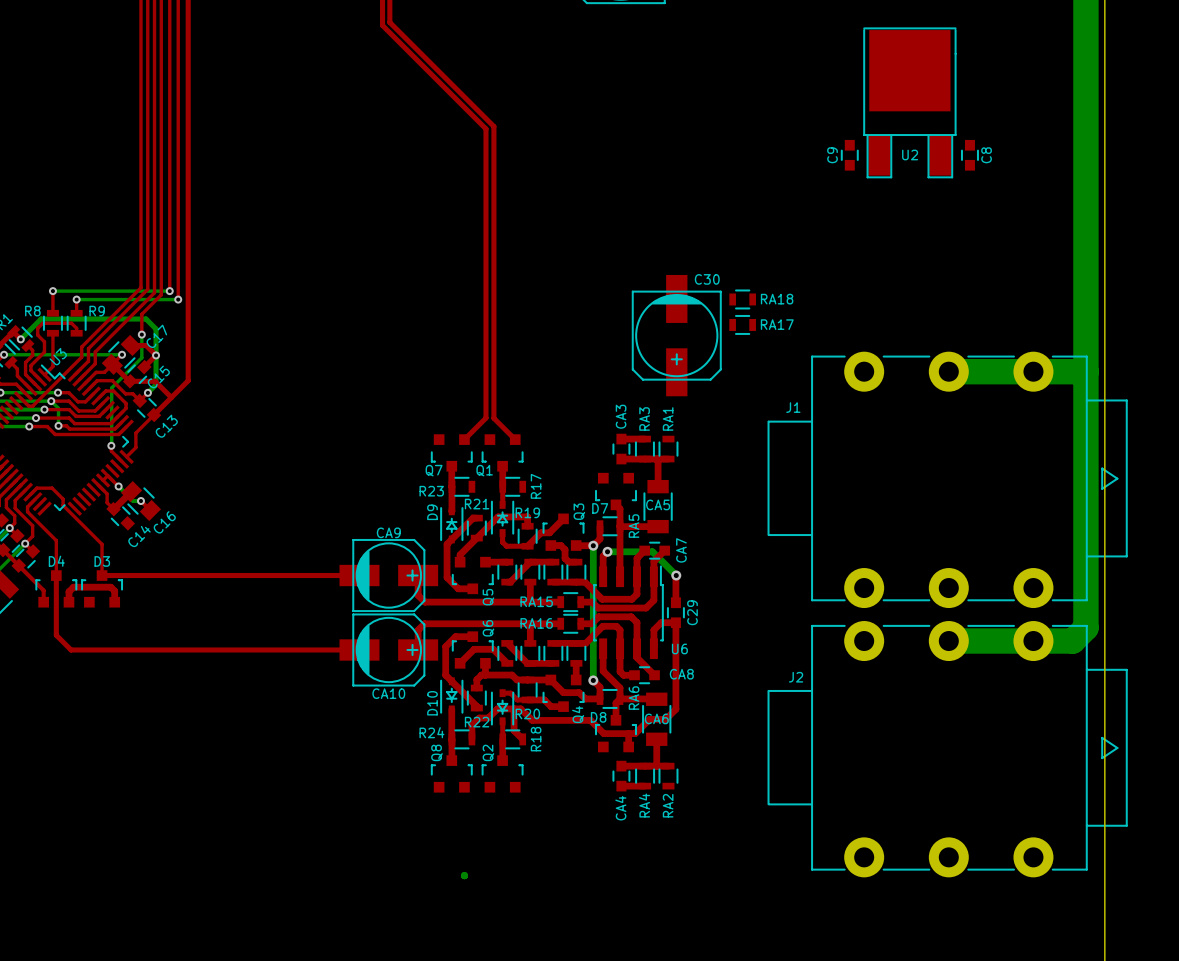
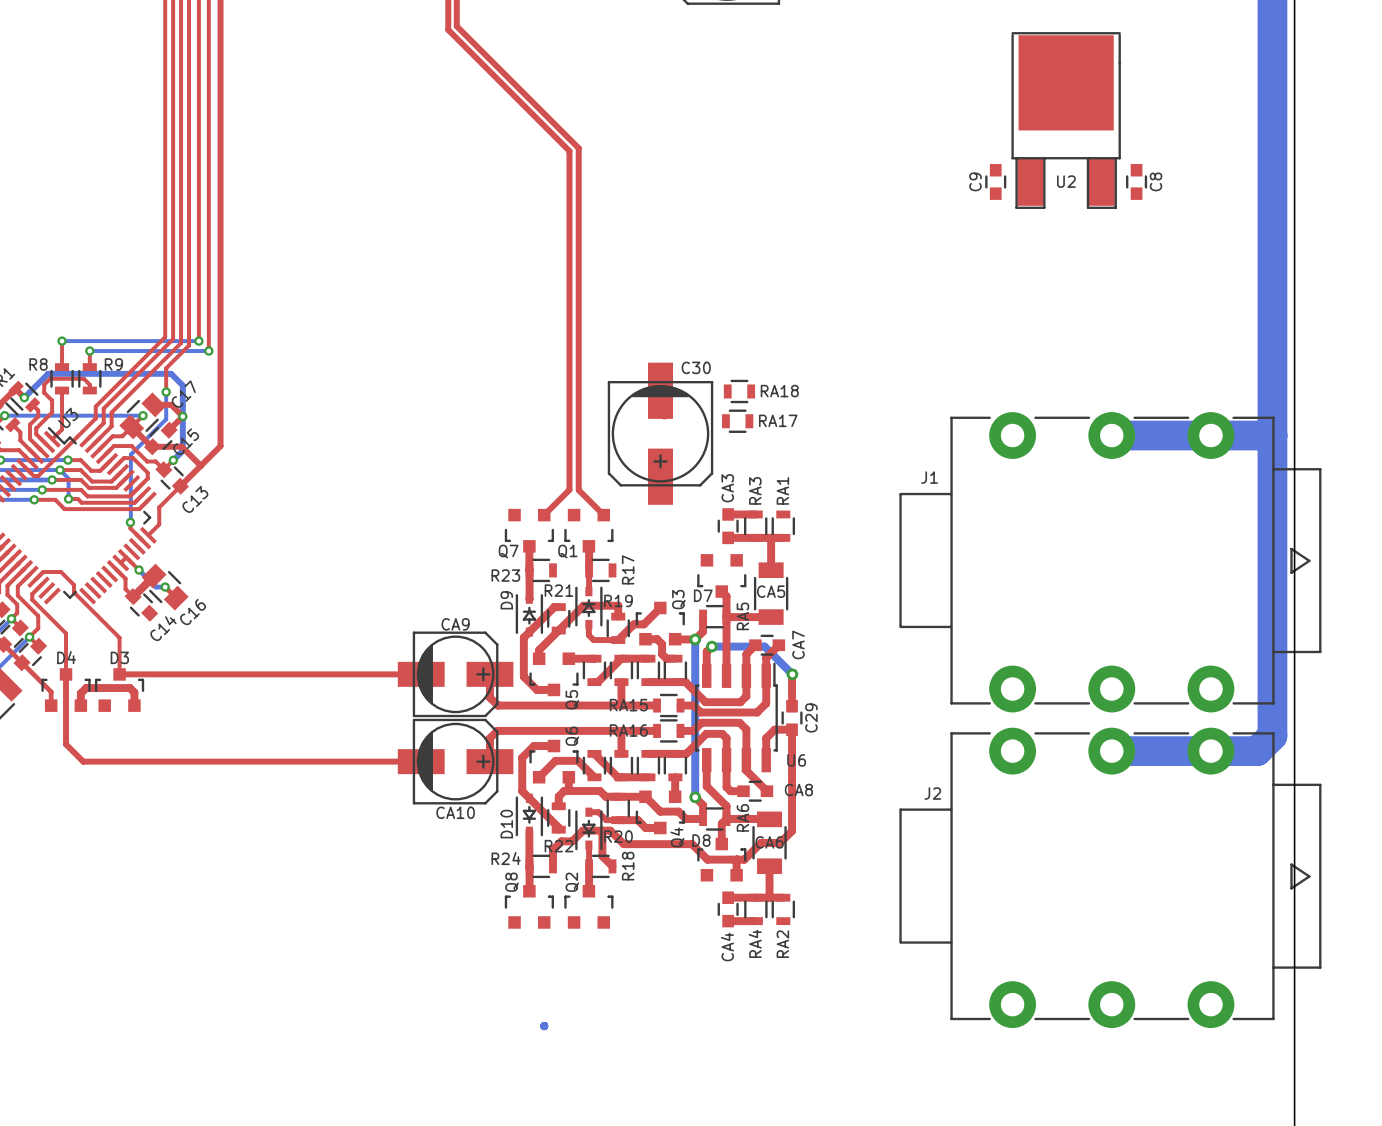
RA18 position: (742, 299) -> (739, 391)
RA17 position: (742, 324) -> (737, 421)
C30 position: (676, 335) -> (660, 433)

